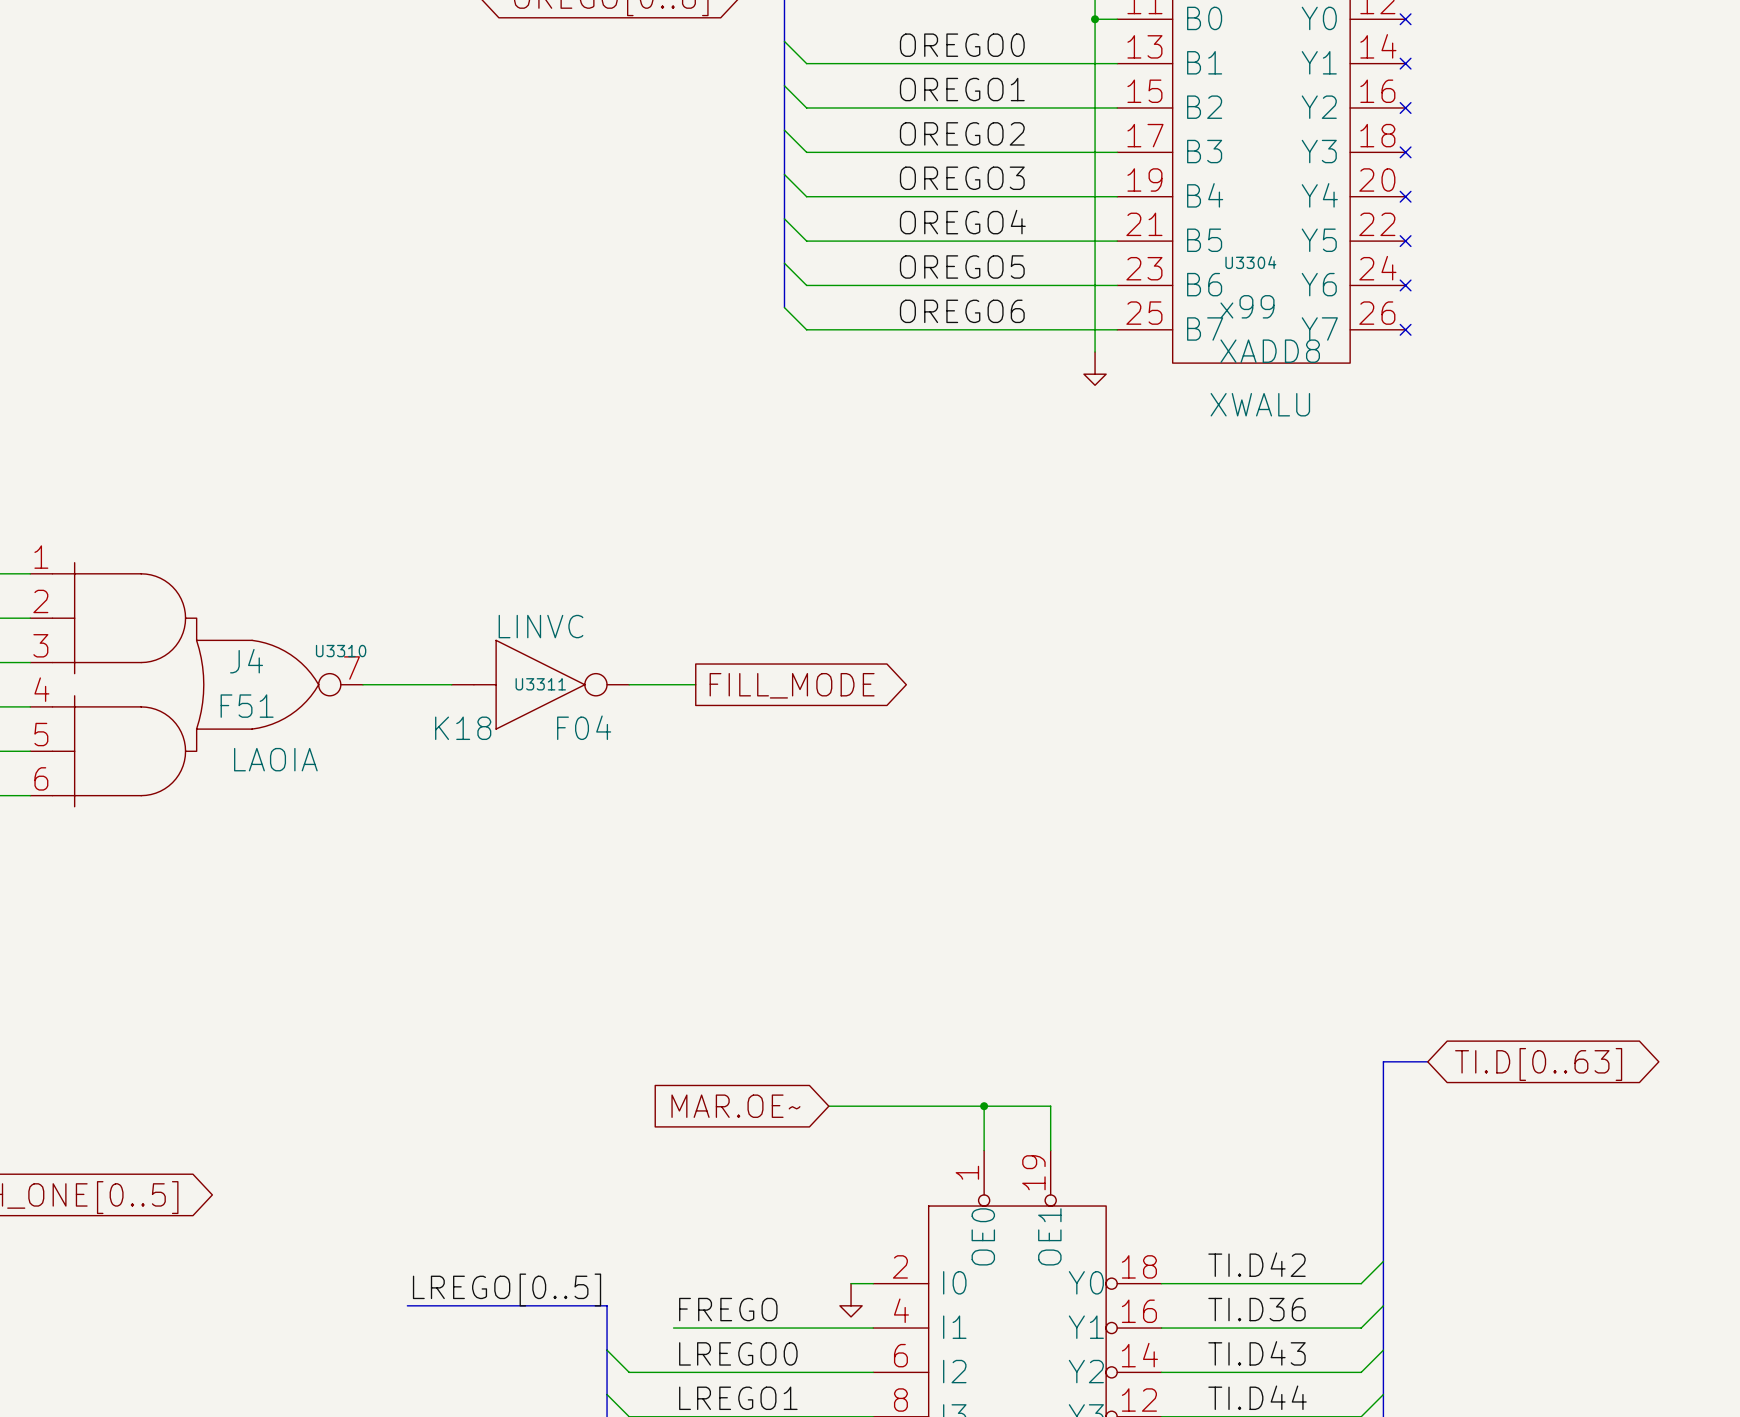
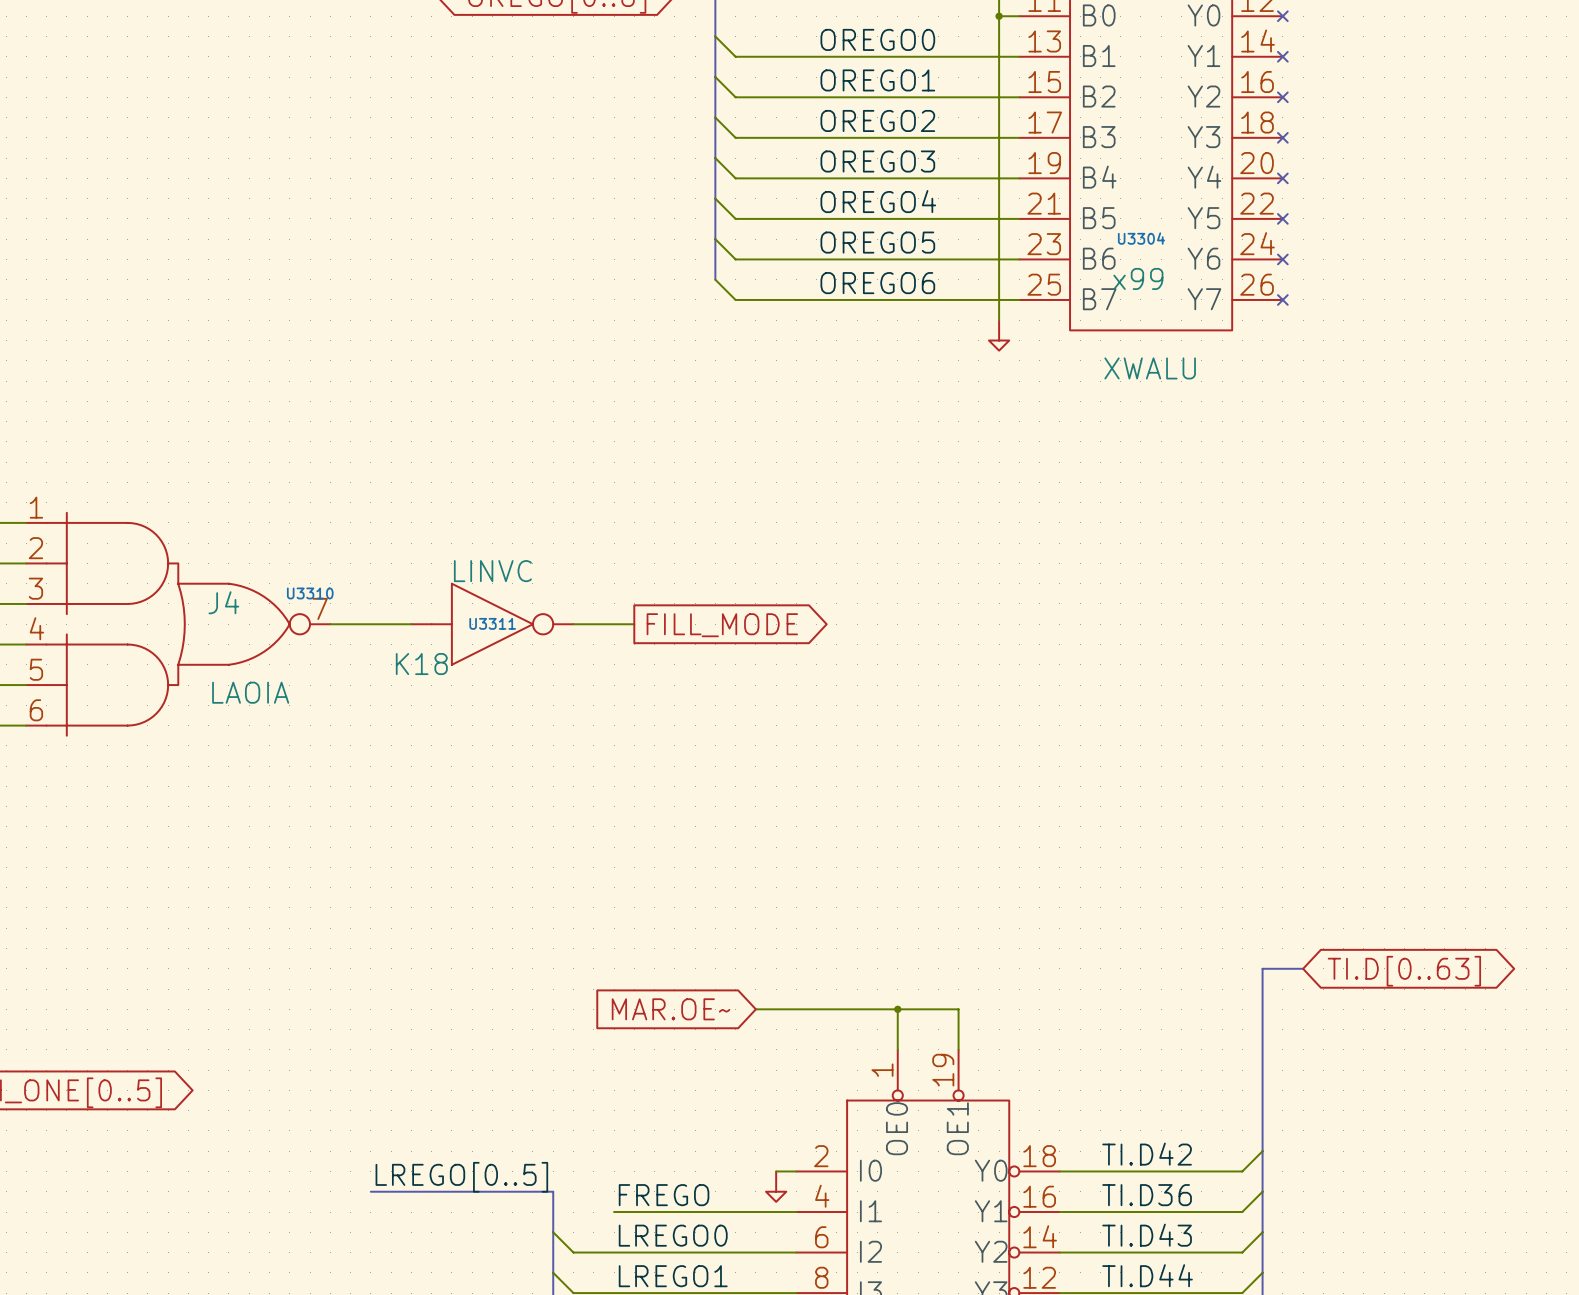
U3304 value: XADD8 (1270, 351) -> none
U3310 value: F51 (247, 706) -> none
U3311 value: F04 (584, 727) -> none

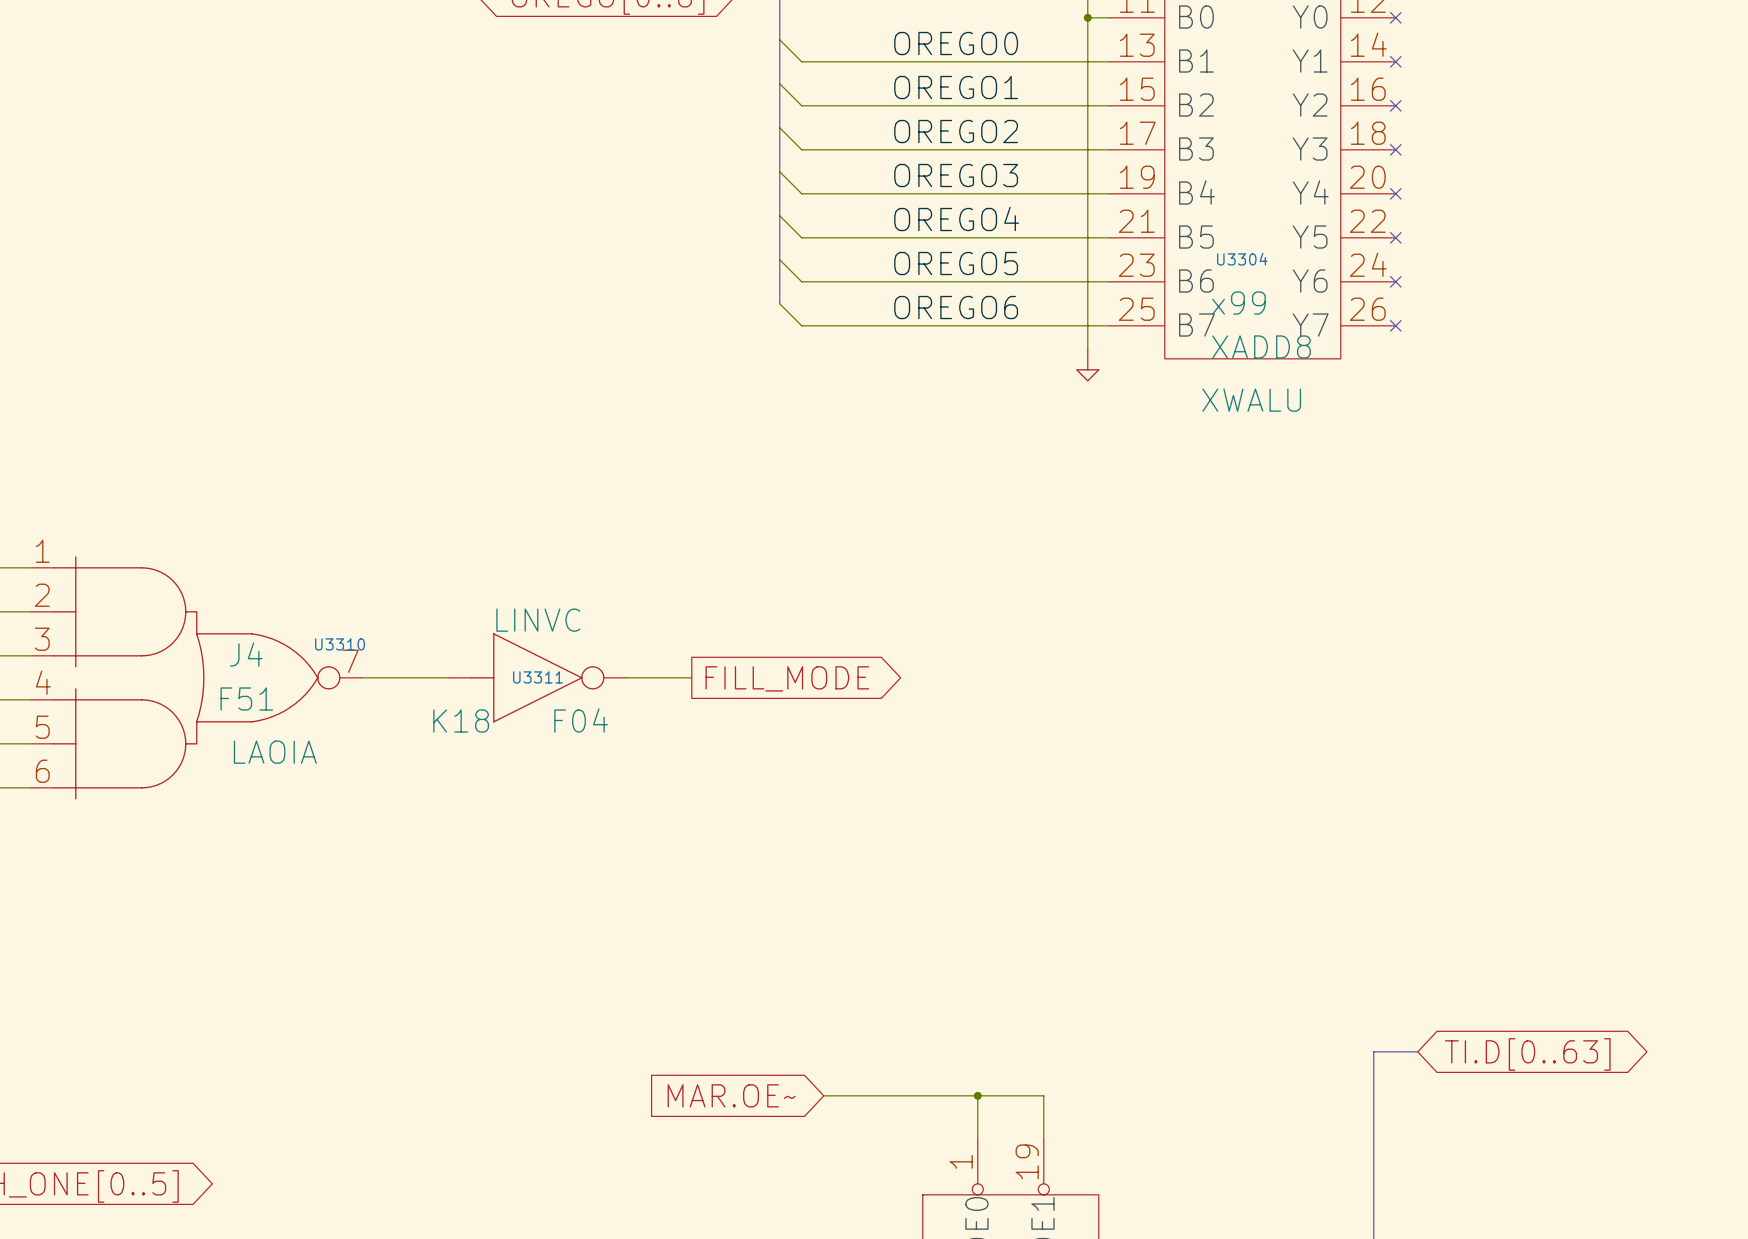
U3304 value: none -> XADD8 (1261, 347)
U3310 value: none -> F51 (246, 699)
U3311 value: none -> F04 (581, 720)

